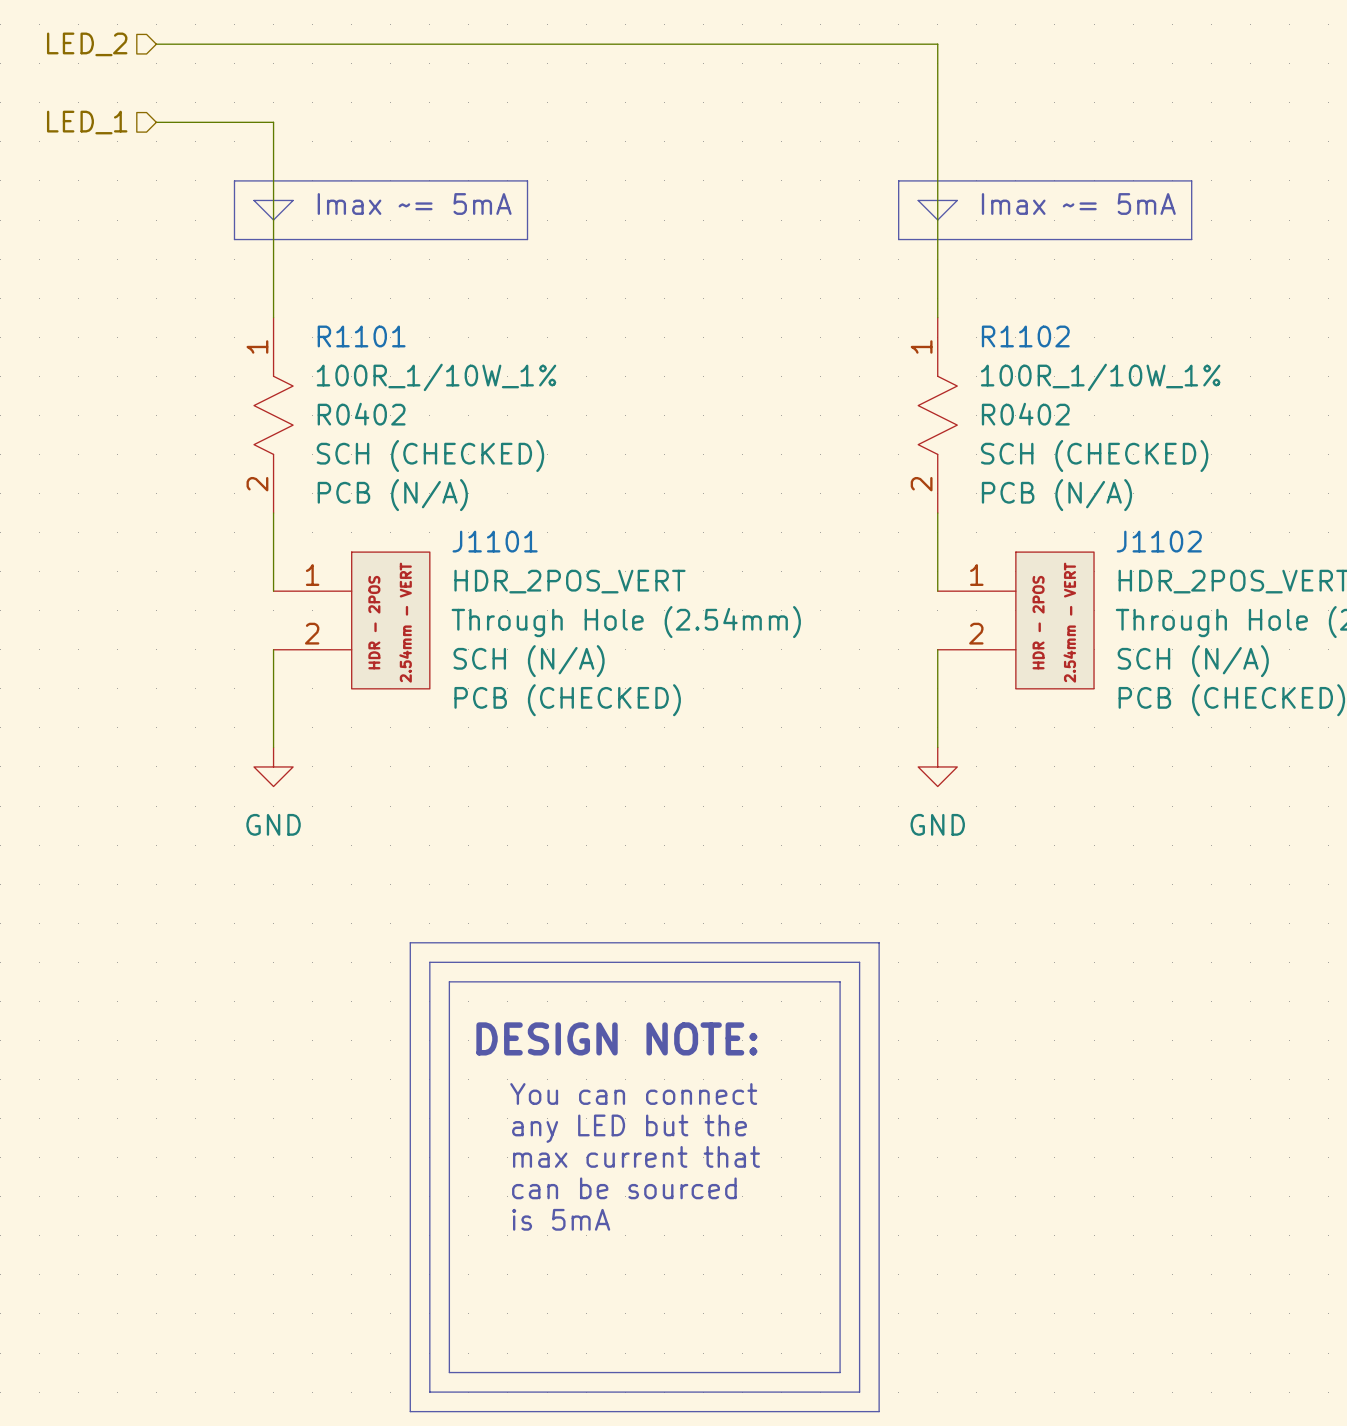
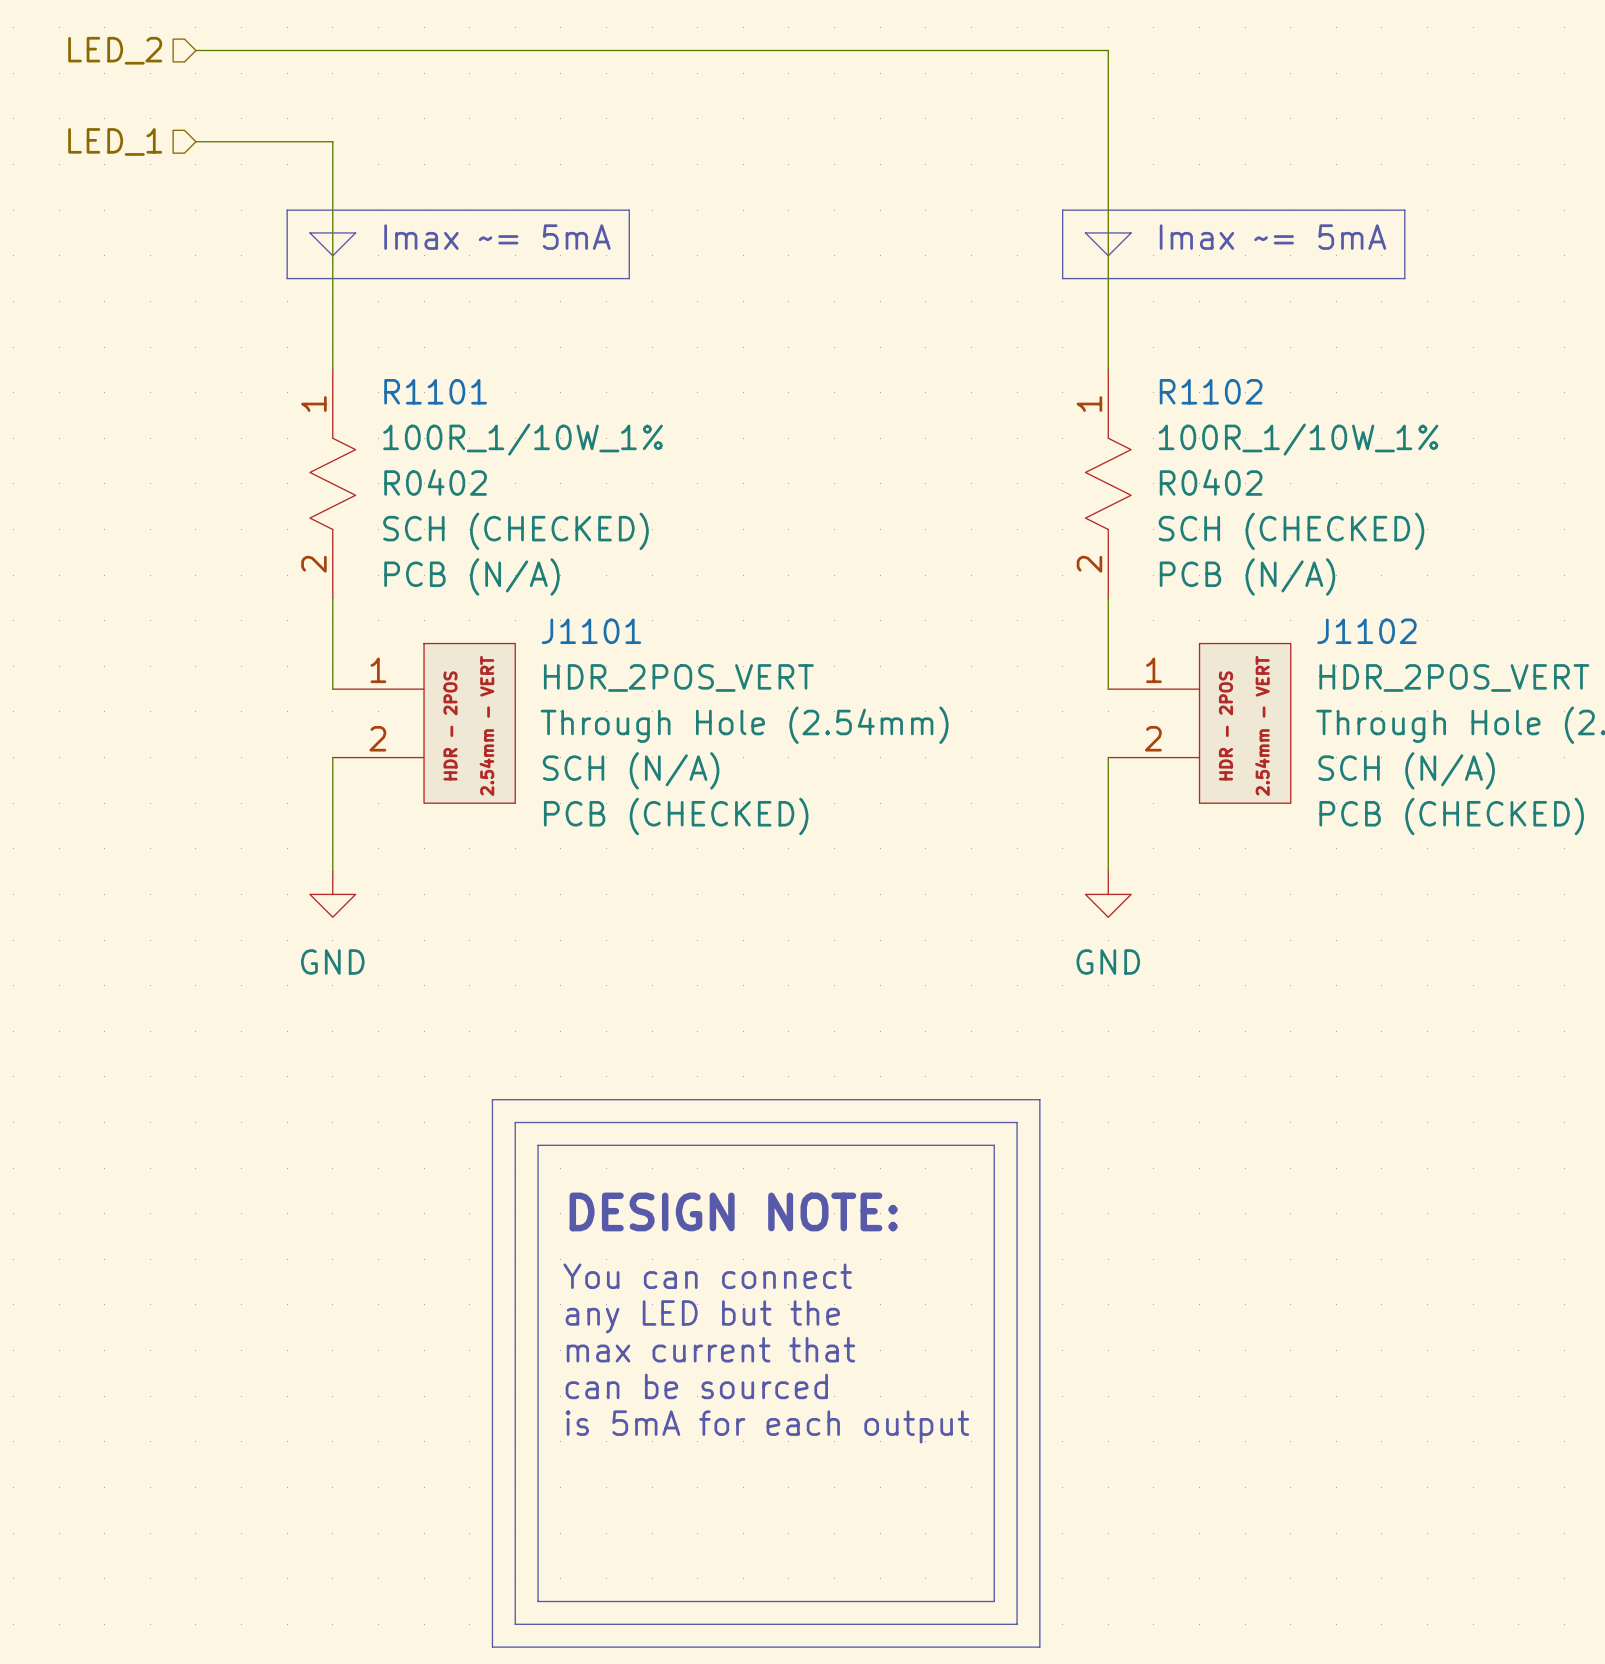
text position: You can connect (633, 1094) -> You can connect (707, 1276)
text position: any LED but the (629, 1128) -> any LED but the (702, 1316)
text position: max current that (636, 1156) -> max current that (710, 1349)
text position: can be sourced (624, 1188) -> can be sourced (696, 1386)
text: is 5mA (561, 1219) -> none
text: none -> is 5mA for each output (767, 1426)

